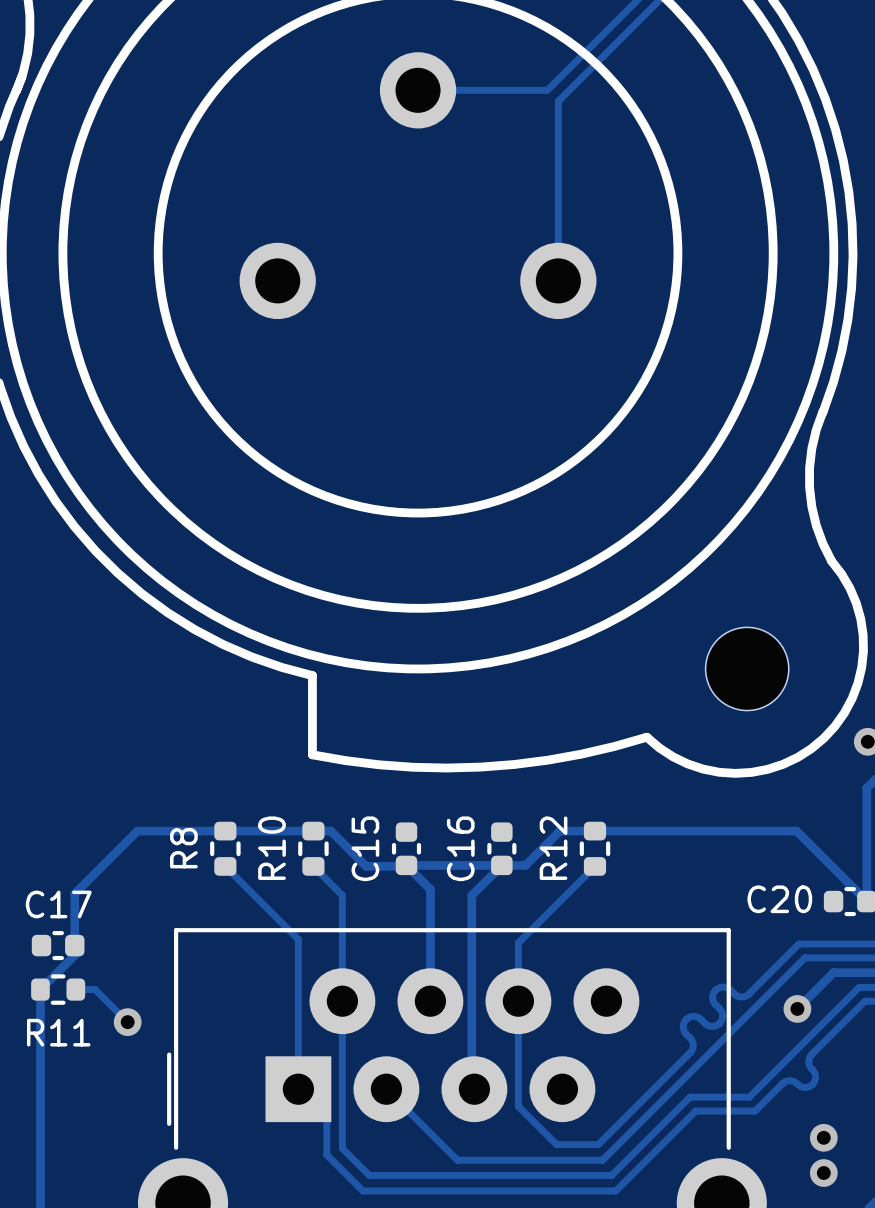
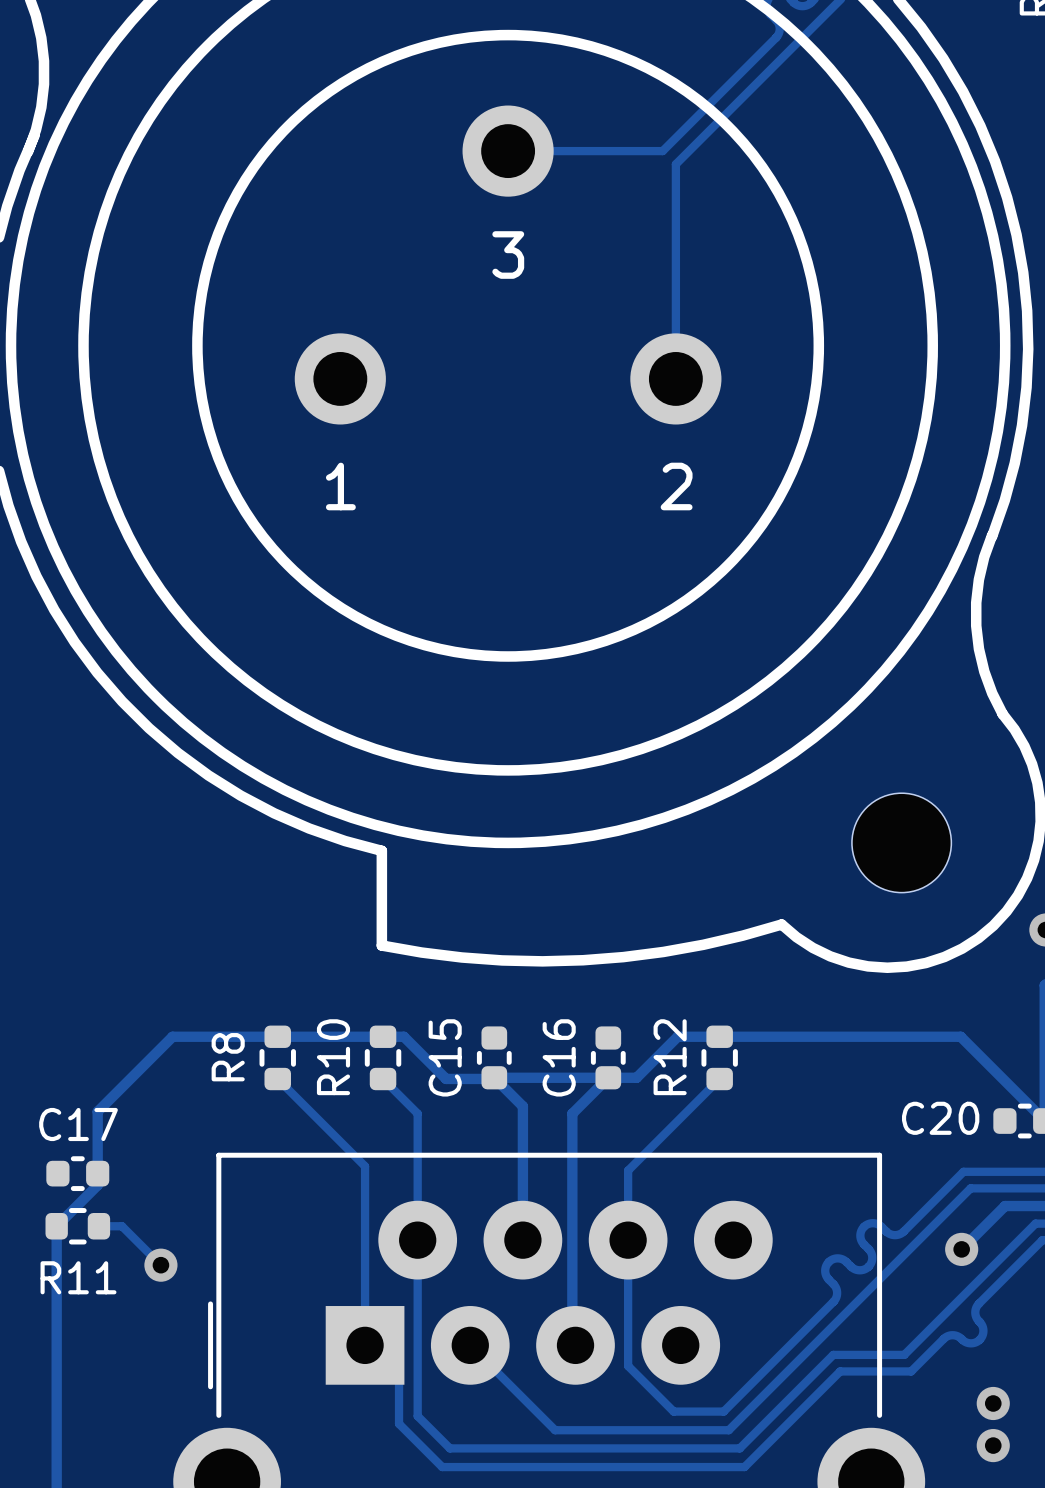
text: none -> 3 (508, 255)
text: none -> 1 (340, 486)
text: none -> 2 (676, 486)

